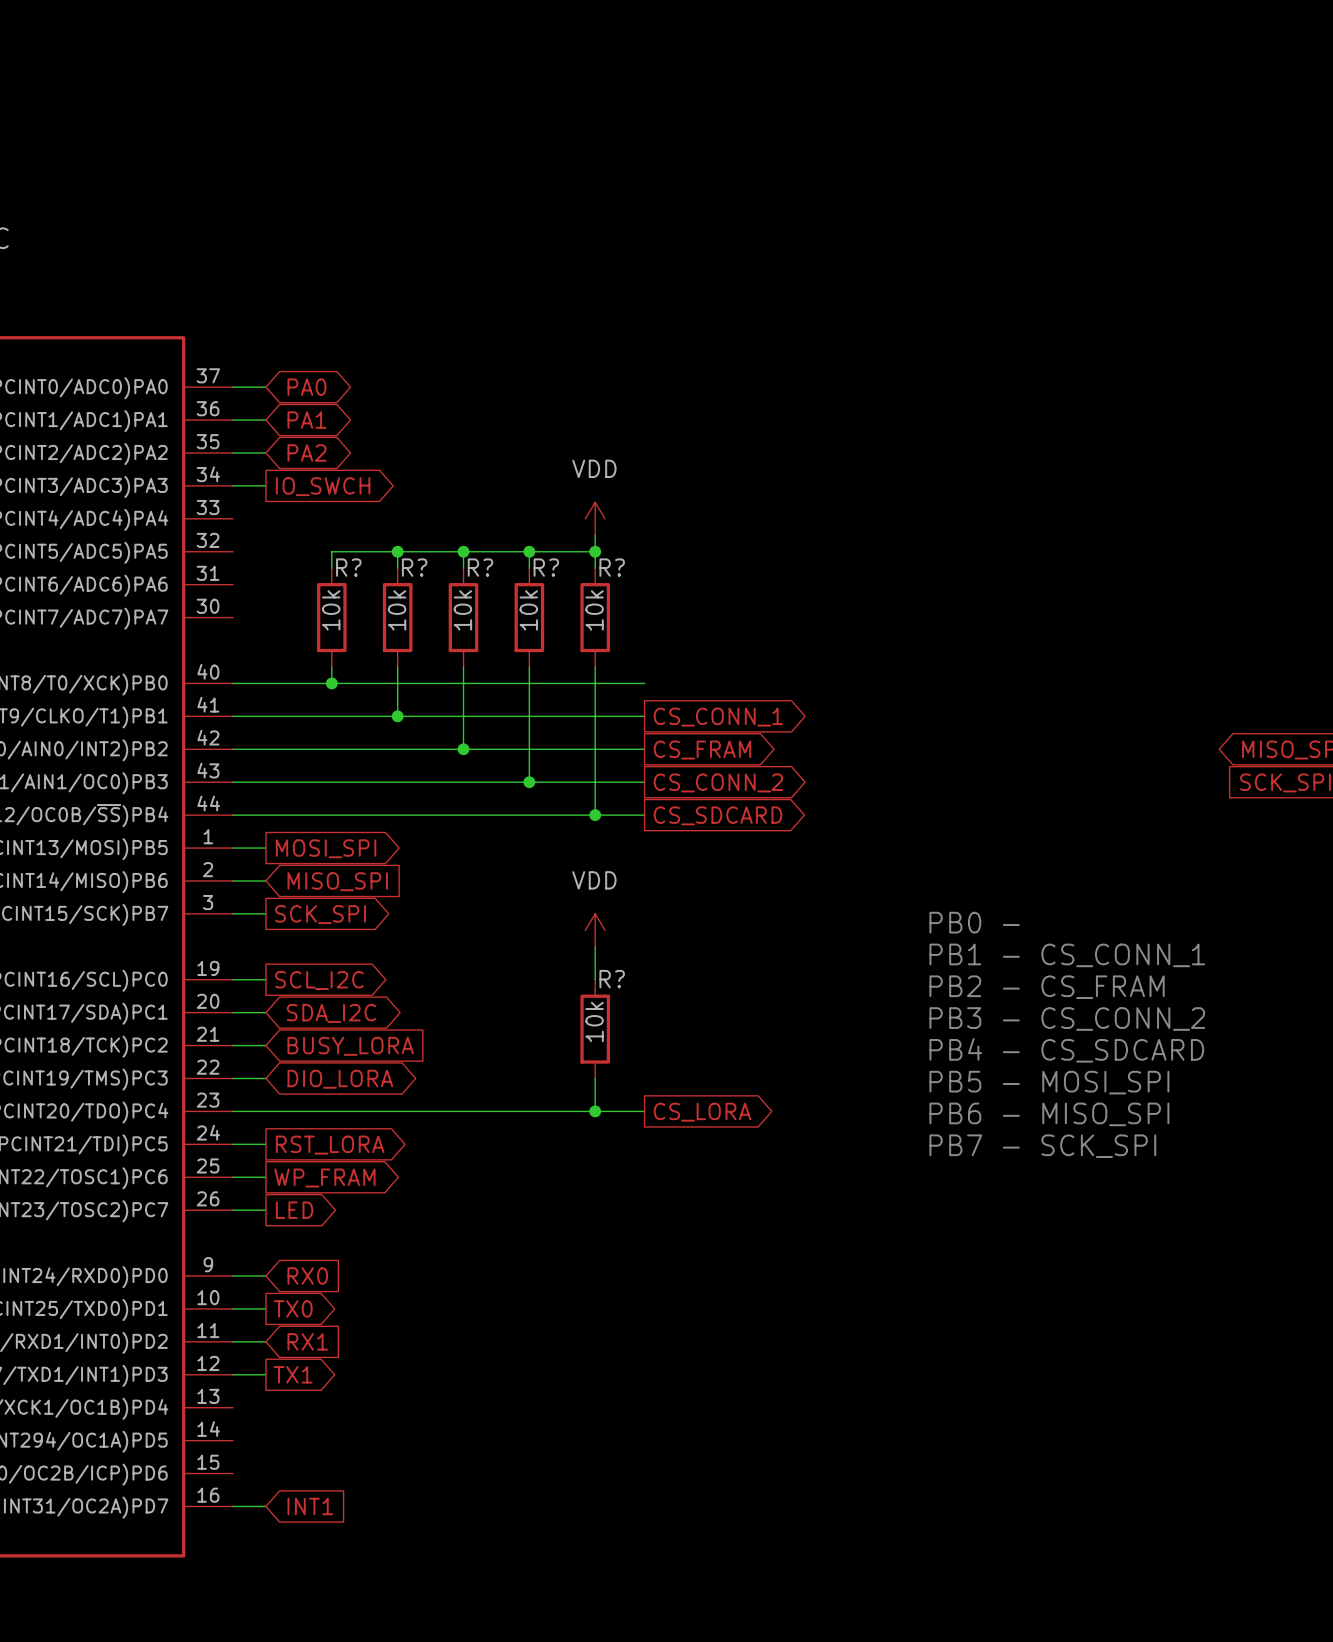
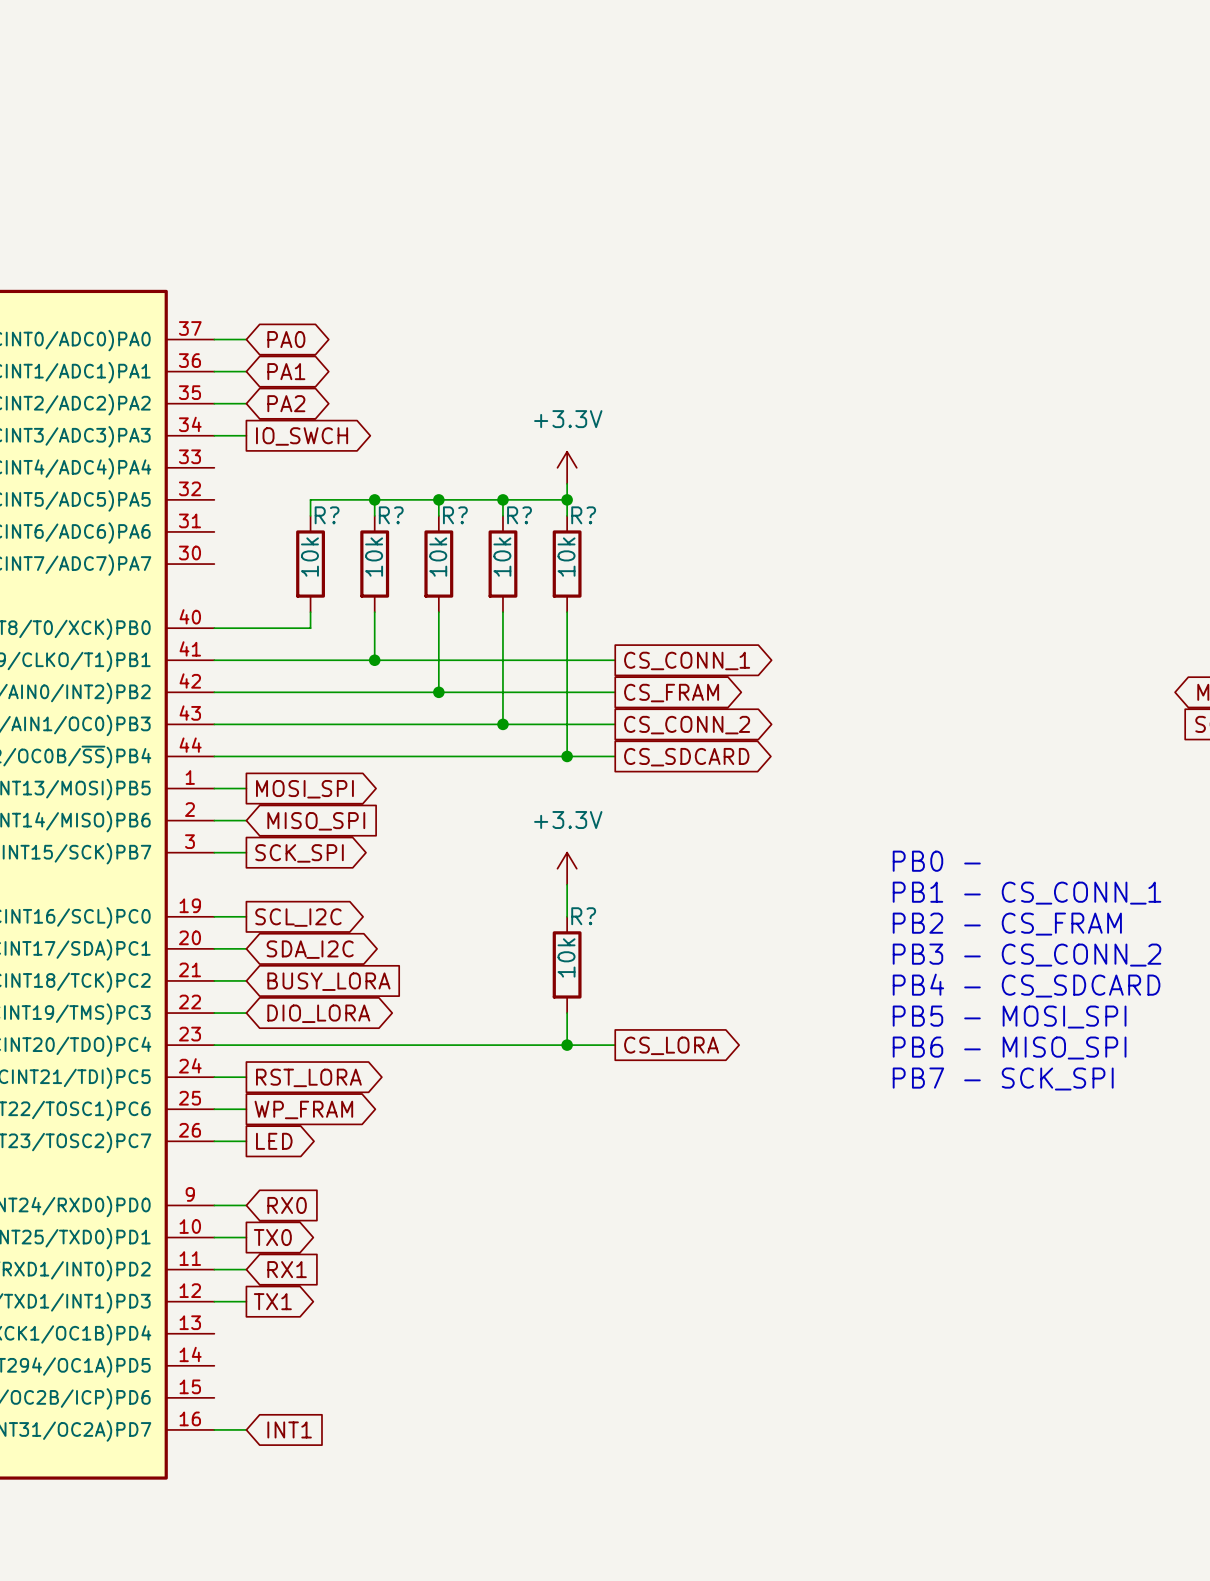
power symbol: VDD (595, 518) -> +3.3V (567, 467)
wire: (331, 683) (644, 683) -> none
junction: (331, 683) -> none
power symbol: VDD (595, 930) -> +3.3V (567, 868)

